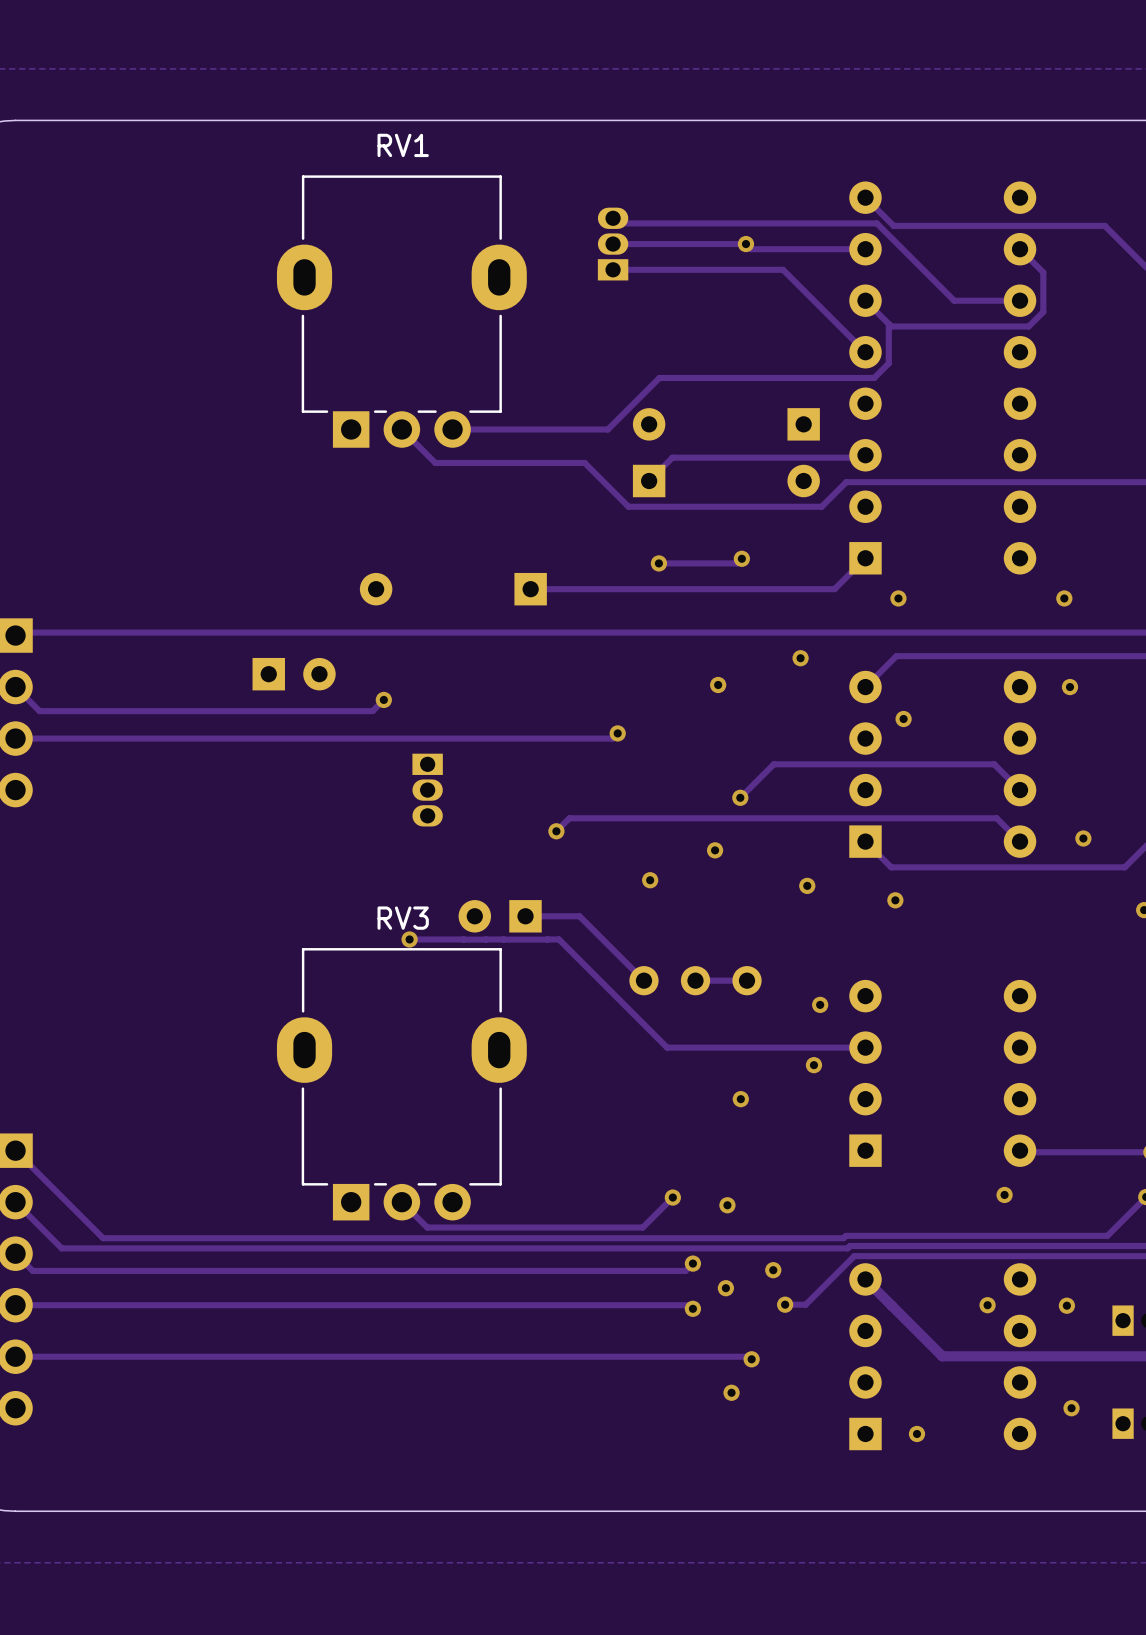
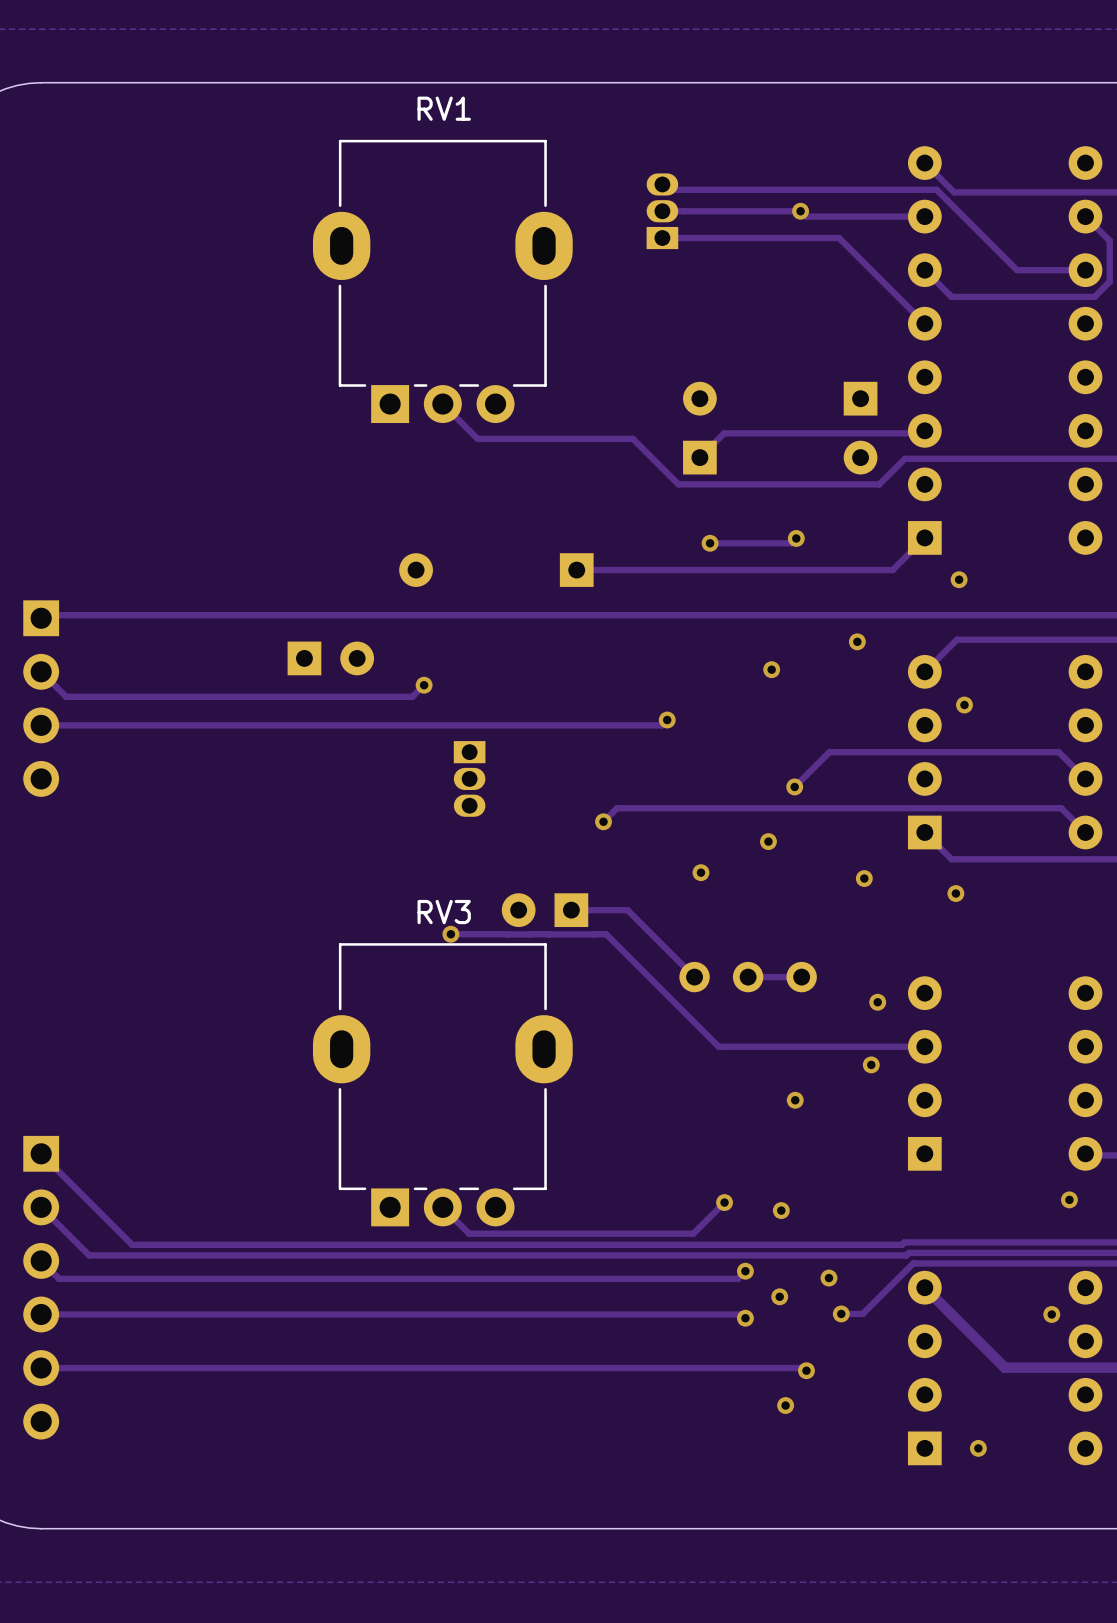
track: (888, 324) (888, 363) (874, 377) (659, 377) (607, 429) (452, 429) -> none

